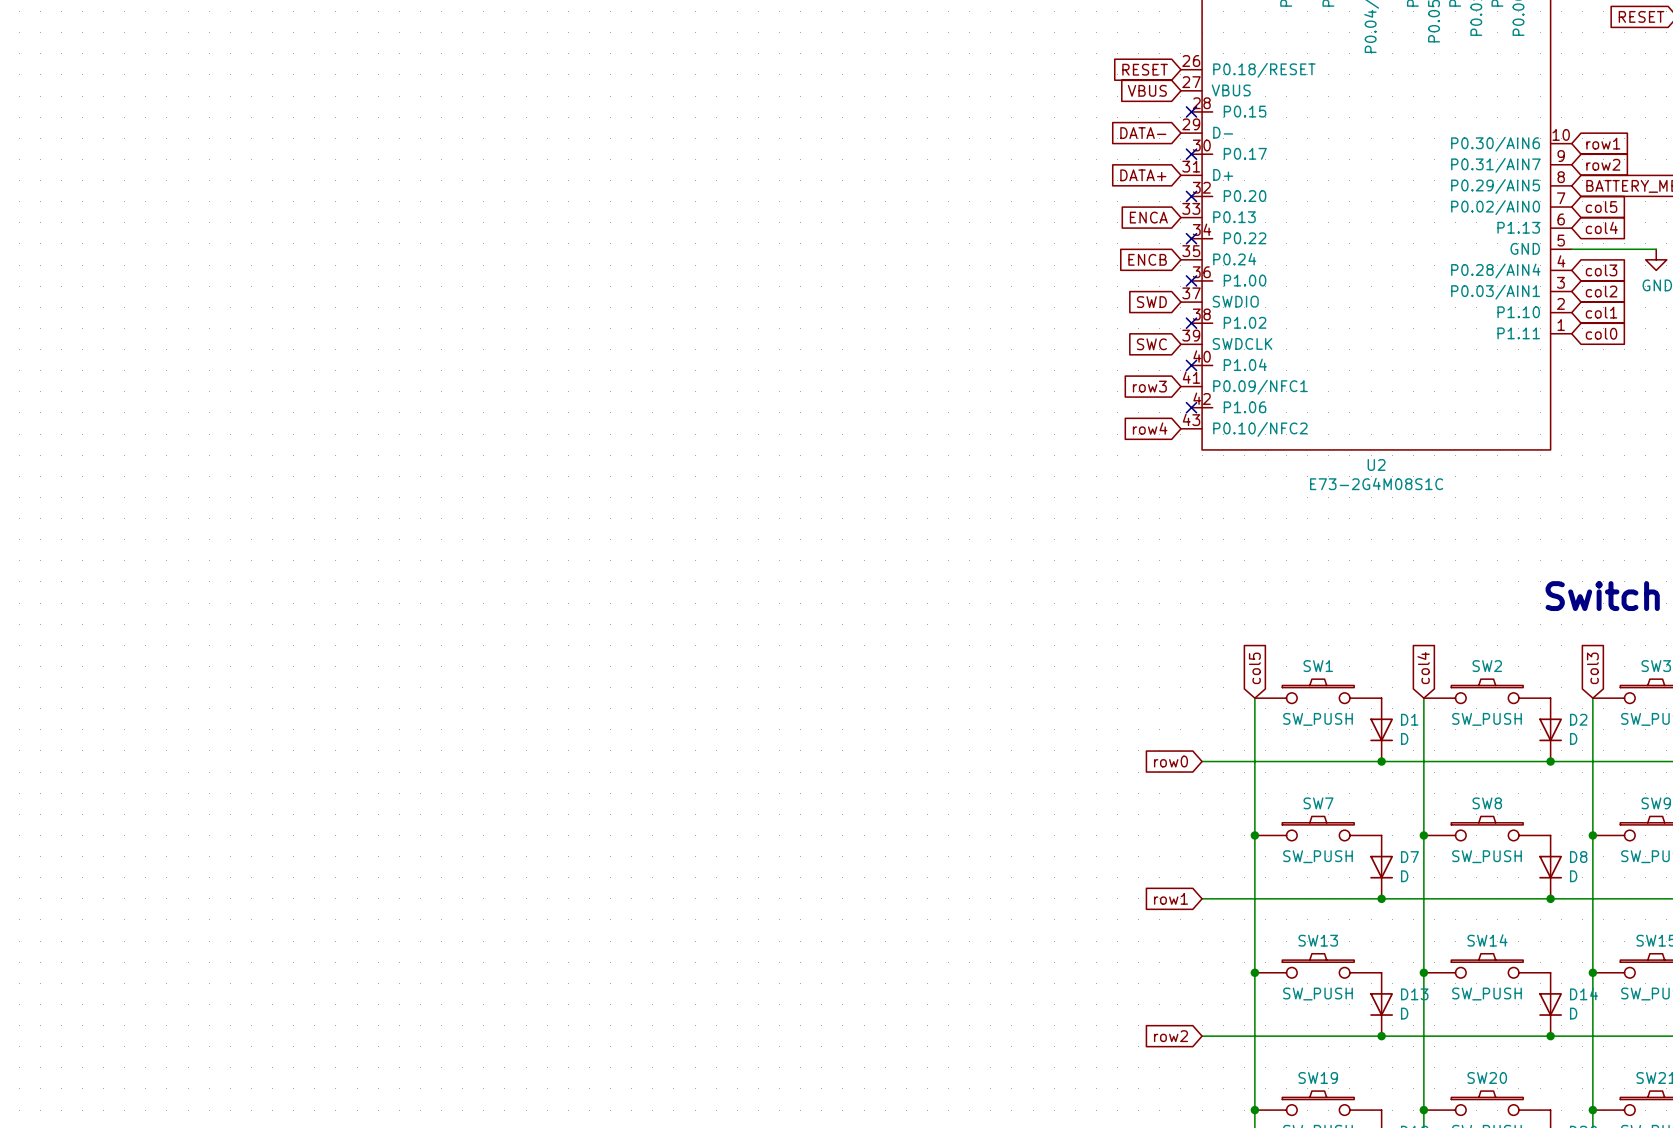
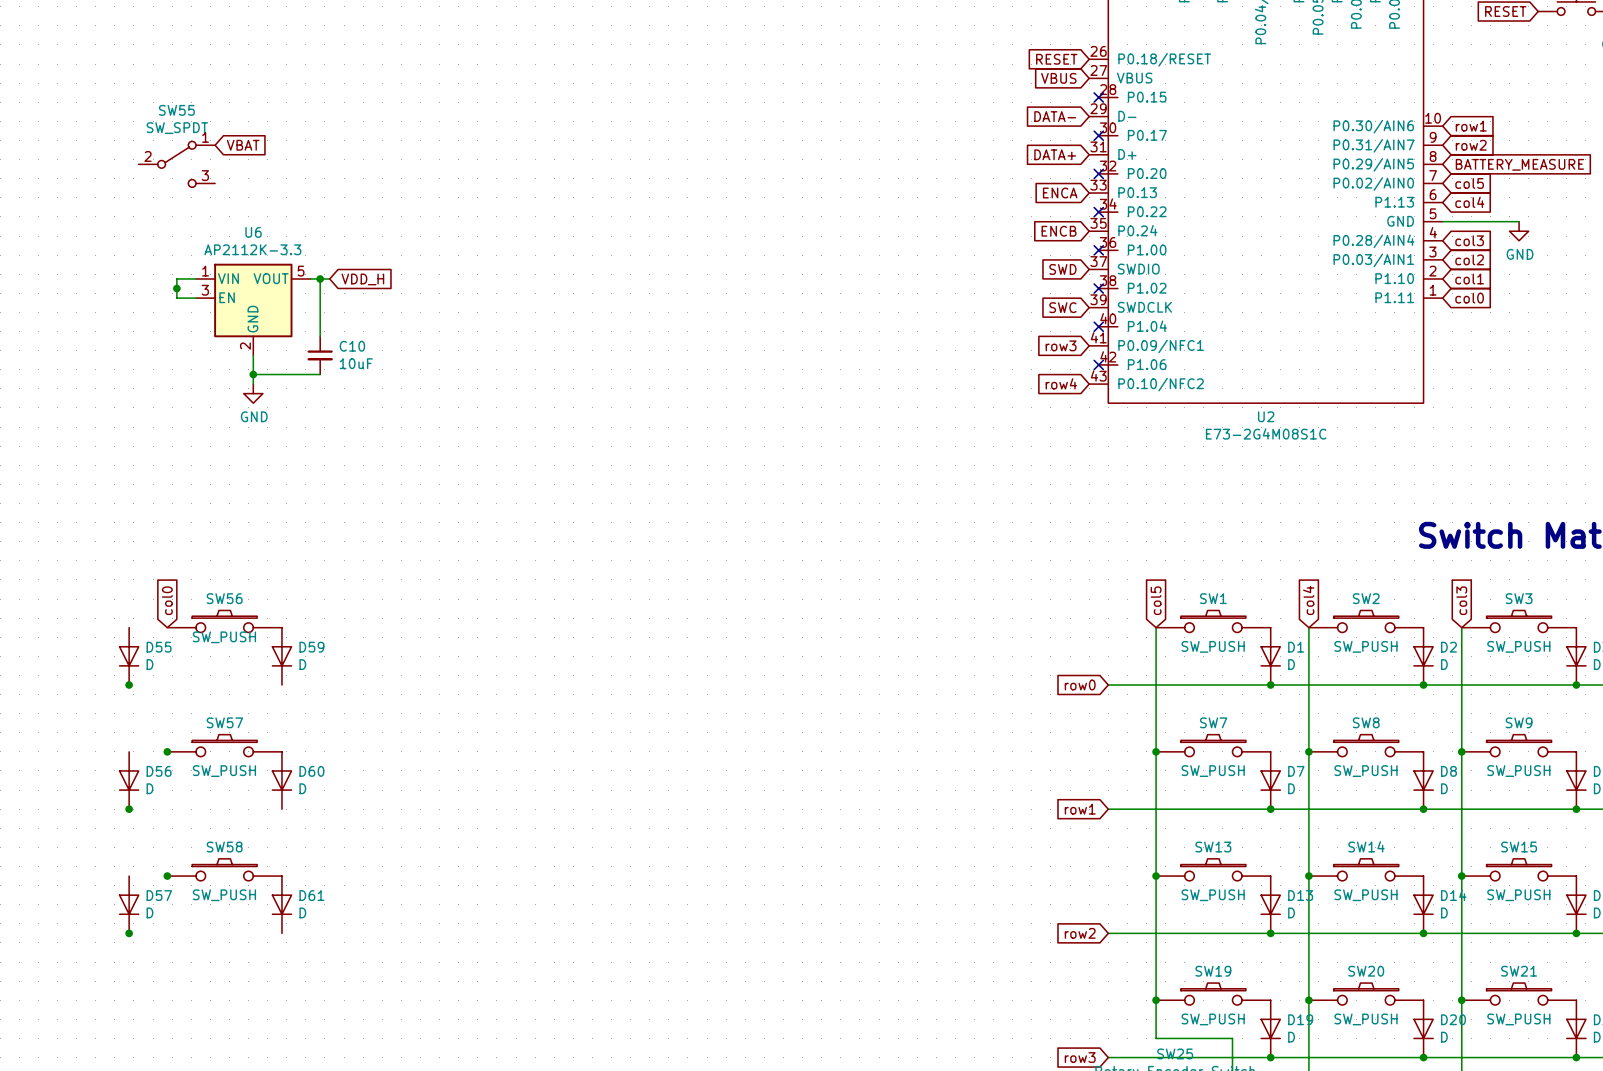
global label: none -> VBAT (243, 145)
SW55: none -> SW_SPDT (176, 164)
wire: none -> (196, 278) (176, 278) (176, 298) (196, 298)
wire: none -> (310, 278) (329, 278)
wire: none -> (320, 278) (320, 336)
junction: none -> (320, 278)
global label: none -> VDD_H (362, 279)
junction: none -> (176, 288)
U6: none -> AP2112K-3.3 (253, 309)
wire: none -> (253, 355) (253, 384)
C10: none -> 10uF (320, 355)
wire: none -> (253, 374) (320, 374)
junction: none -> (253, 374)
power symbol: none -> GND (253, 393)
global label: none -> col0 (167, 600)
SW56: none -> SW_PUSH (224, 621)
D55: none -> D (129, 656)
D59: none -> D (281, 656)
junction: none -> (129, 684)
SW57: none -> SW_PUSH (224, 745)
junction: none -> (167, 751)
D56: none -> D (129, 780)
D60: none -> D (281, 780)
junction: none -> (129, 809)
SW58: none -> SW_PUSH (224, 869)
junction: none -> (167, 876)
D57: none -> D (129, 904)
D61: none -> D (281, 904)
junction: none -> (129, 933)

